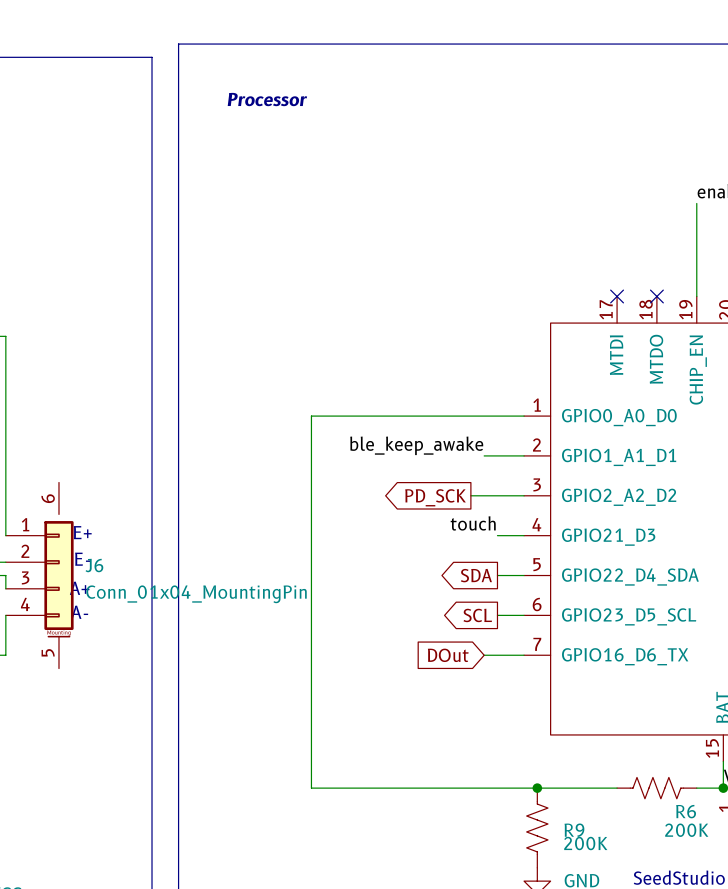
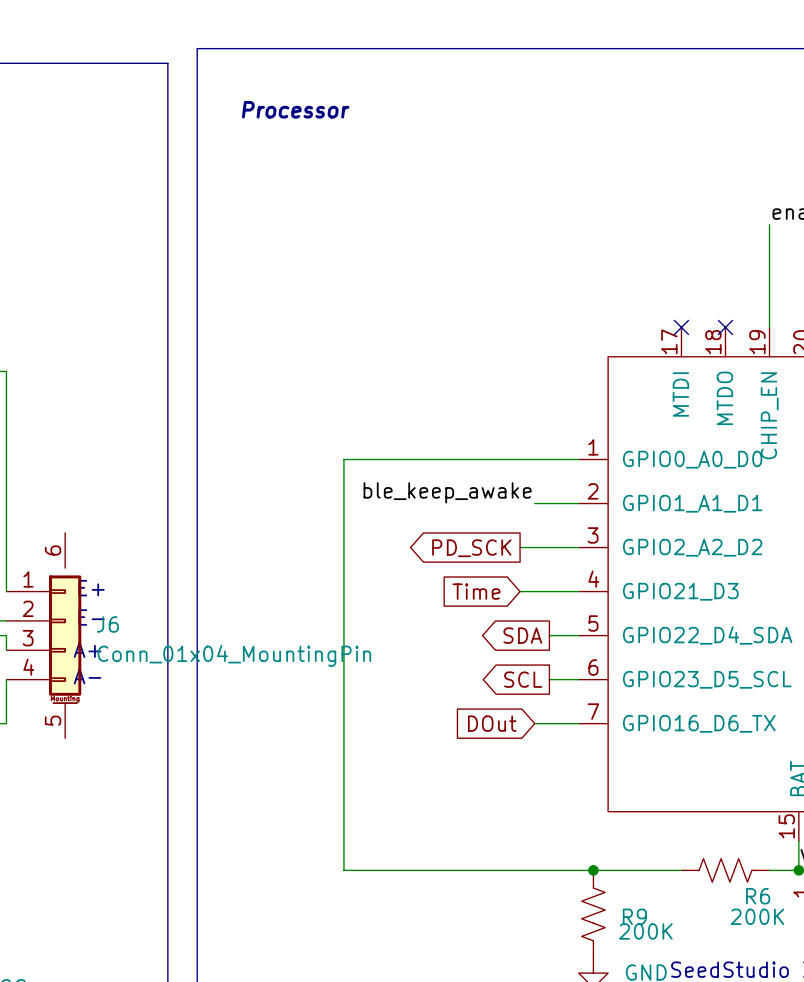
label: touch (473, 523) -> none
global label: none -> Time (476, 591)
wire: none -> (520, 591) (549, 591)

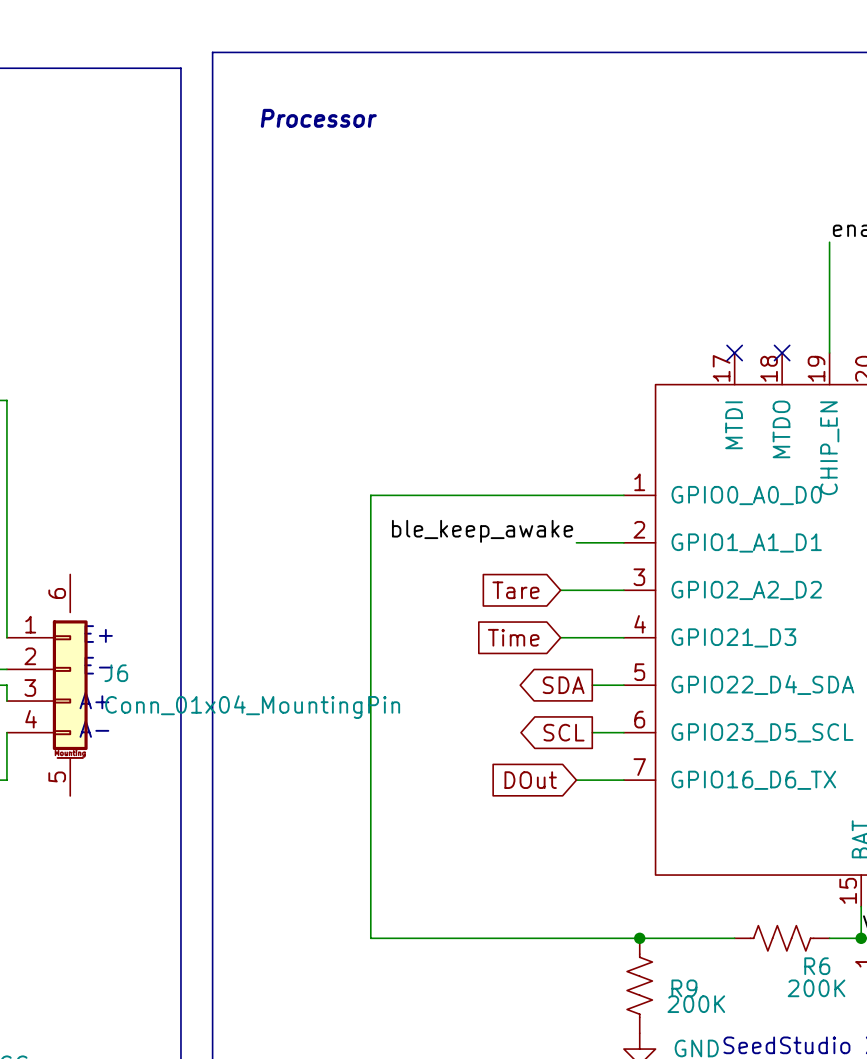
global label shape: output (471, 548) -> input (515, 590)
global label: PD_SCK (471, 548) -> Tare (515, 590)

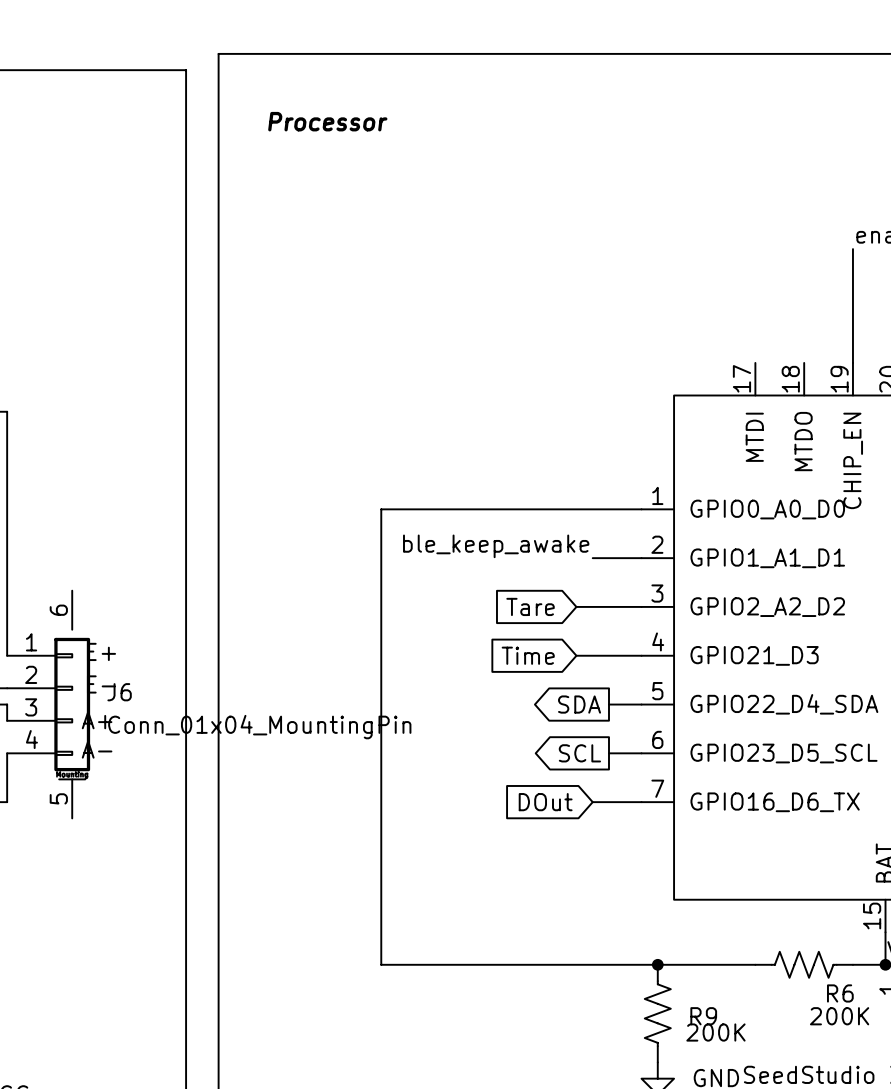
no-connect mark: (734, 352) -> none
no-connect mark: (782, 352) -> none

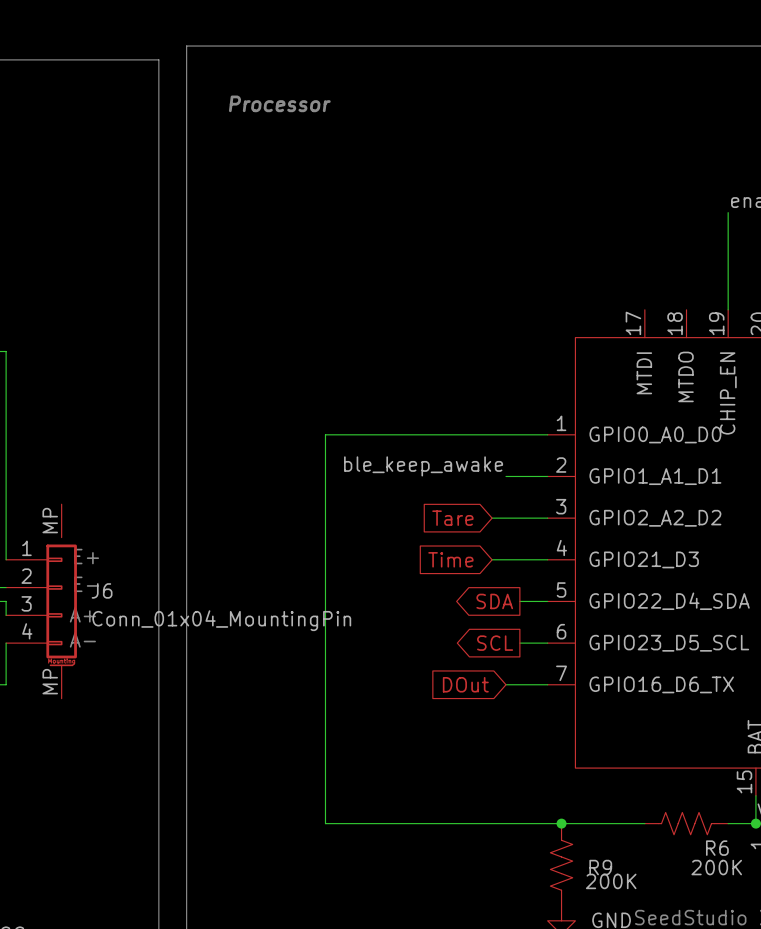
J6 pin number: 6 (58, 610) -> MP (50, 520)
J6 pin number: 5 (58, 798) -> MP (50, 681)

